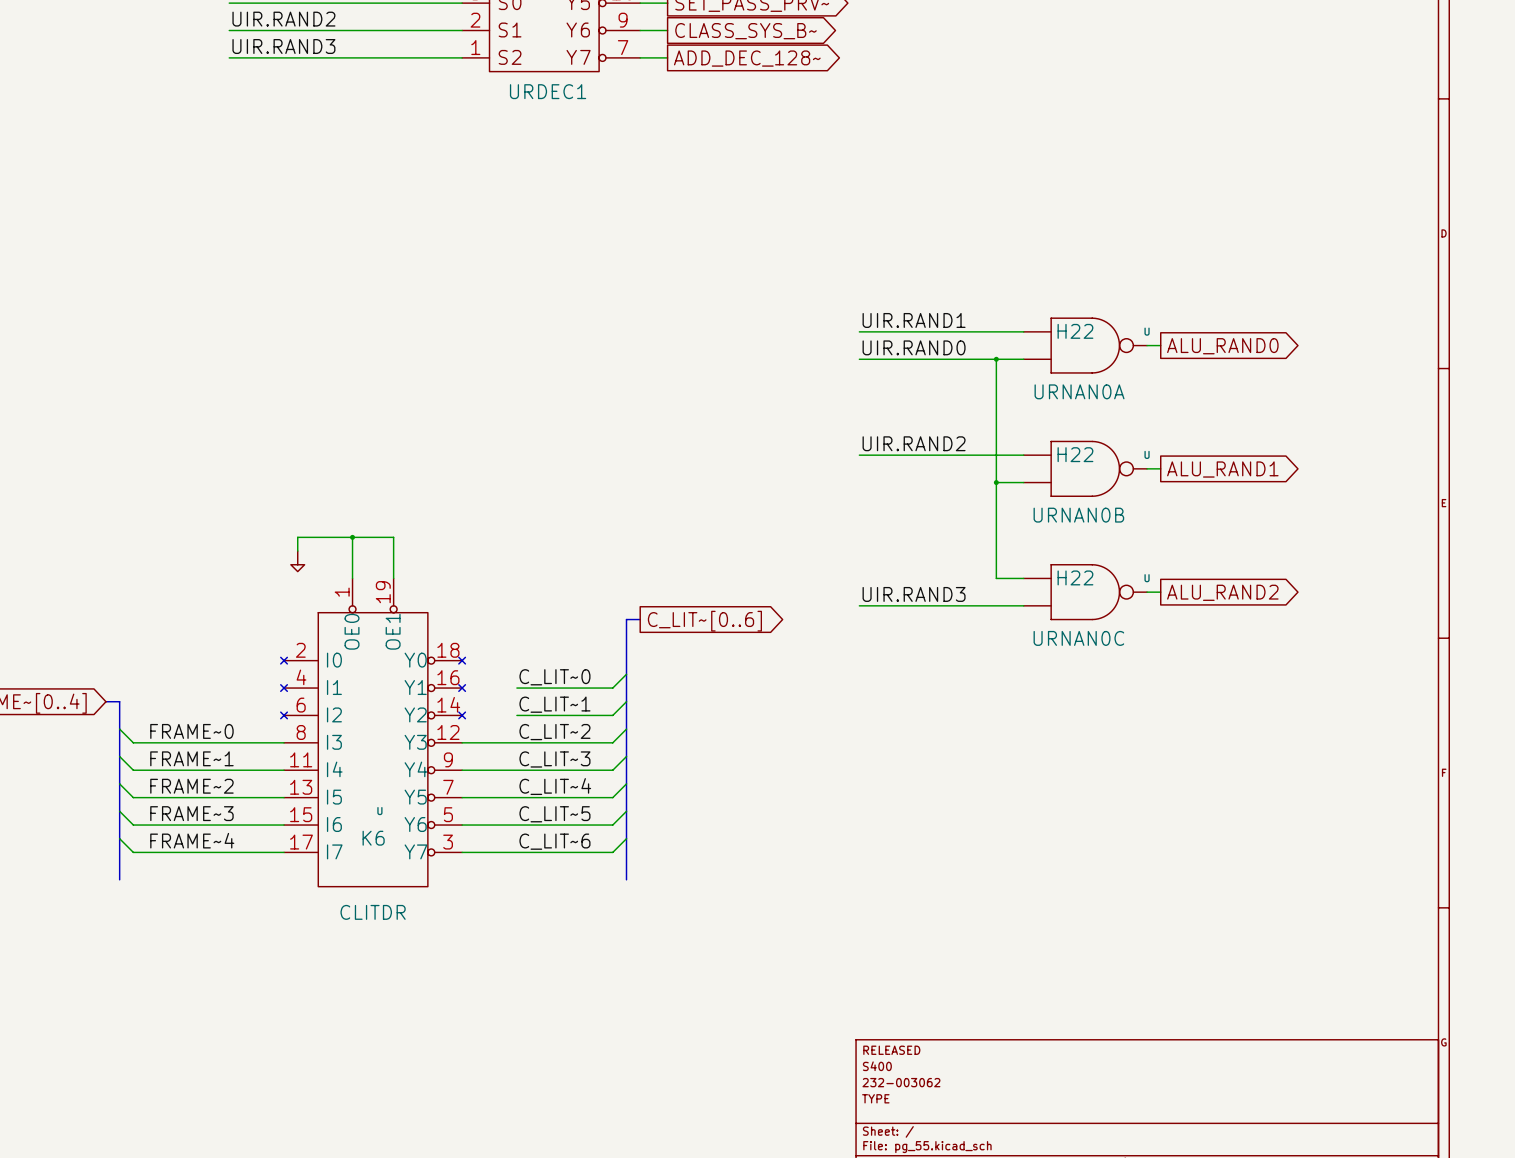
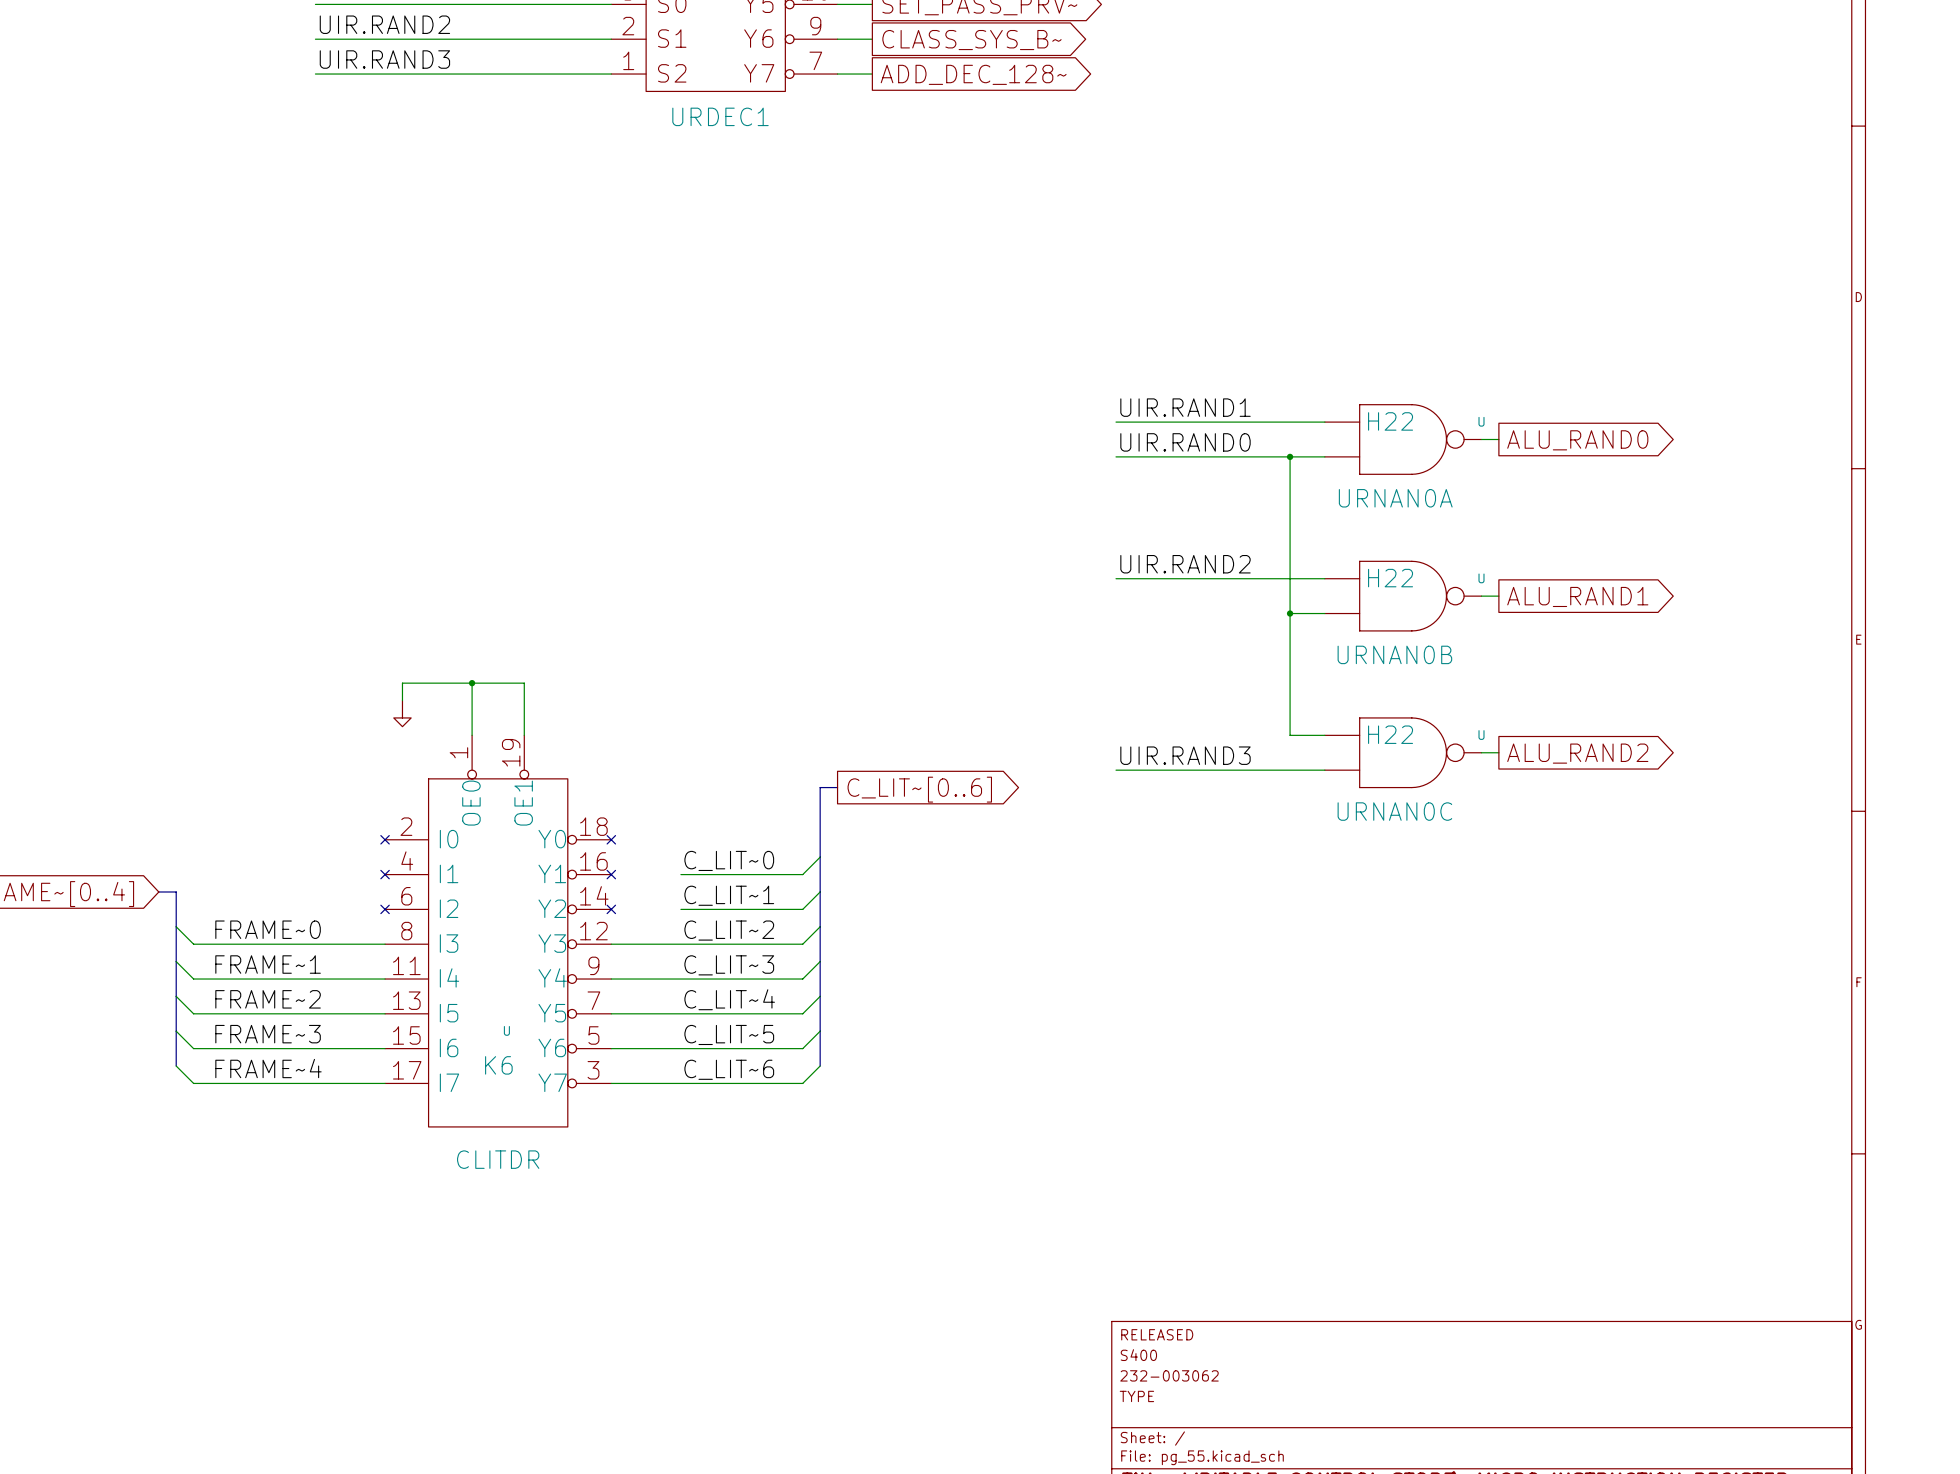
bus: (119, 838) (119, 879) -> none
bus: (626, 838) (626, 879) -> none

